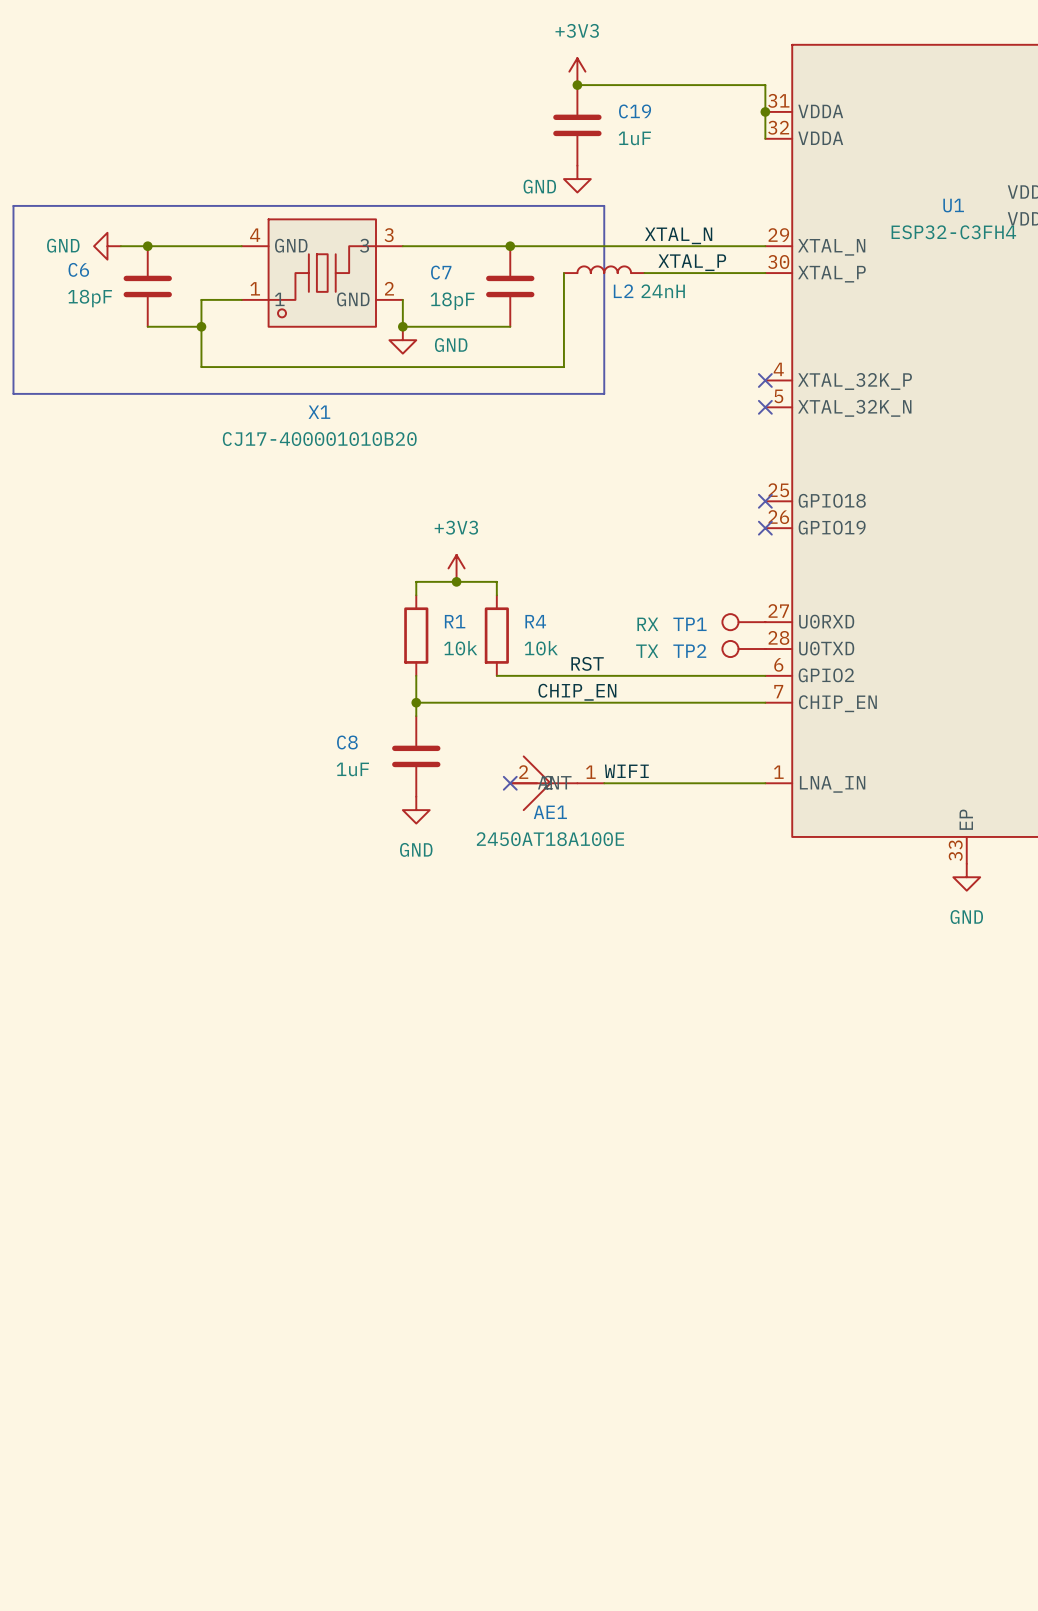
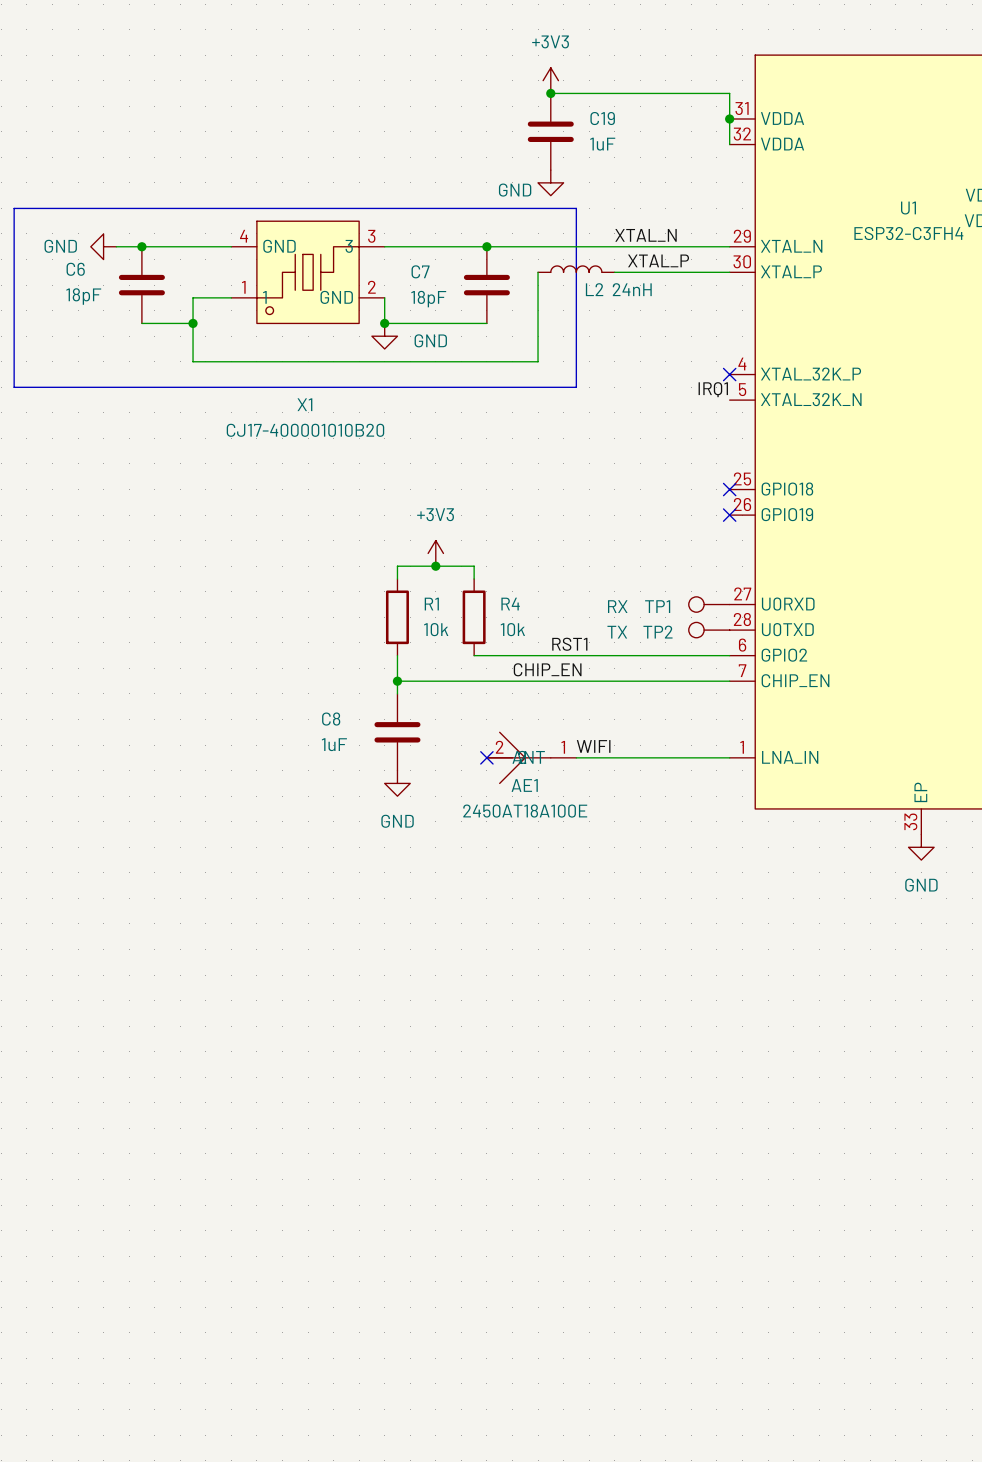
label: none -> IRQ1 (713, 389)
no-connect mark: (765, 407) -> none
label: RST (587, 663) -> RST1 (569, 644)

